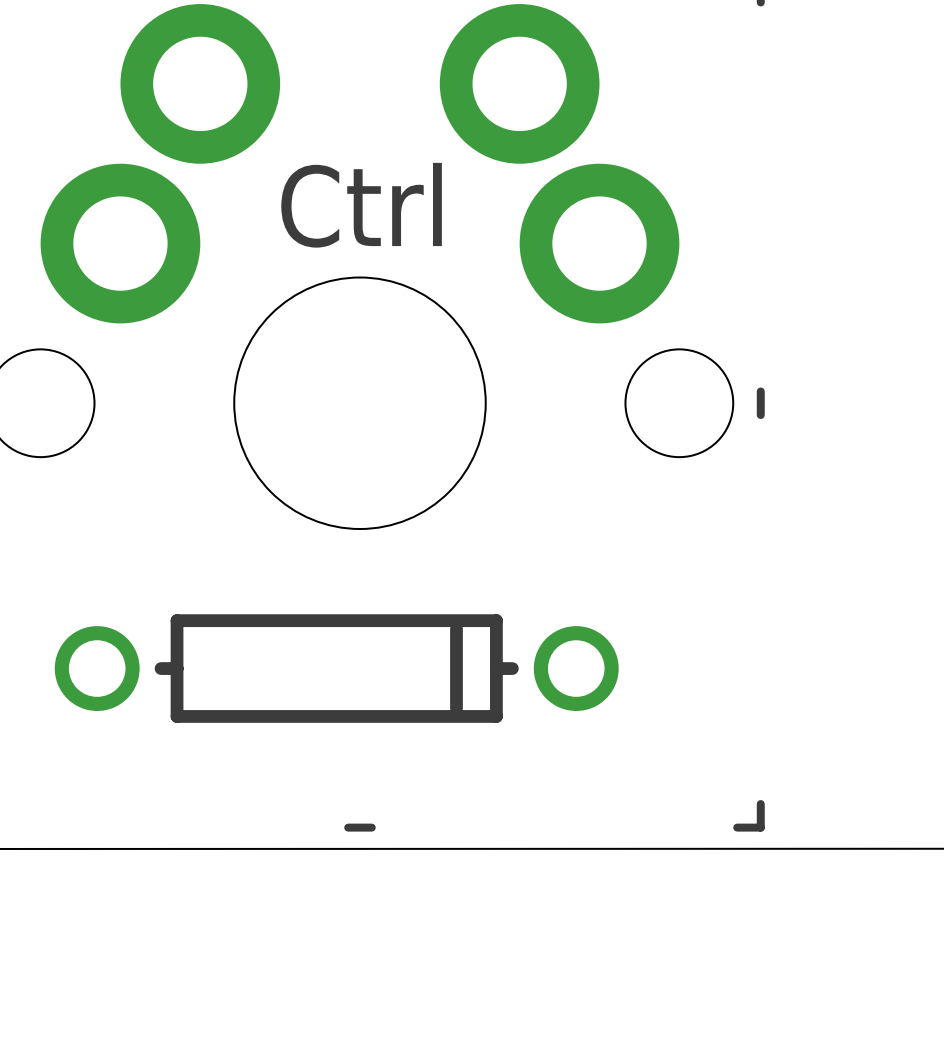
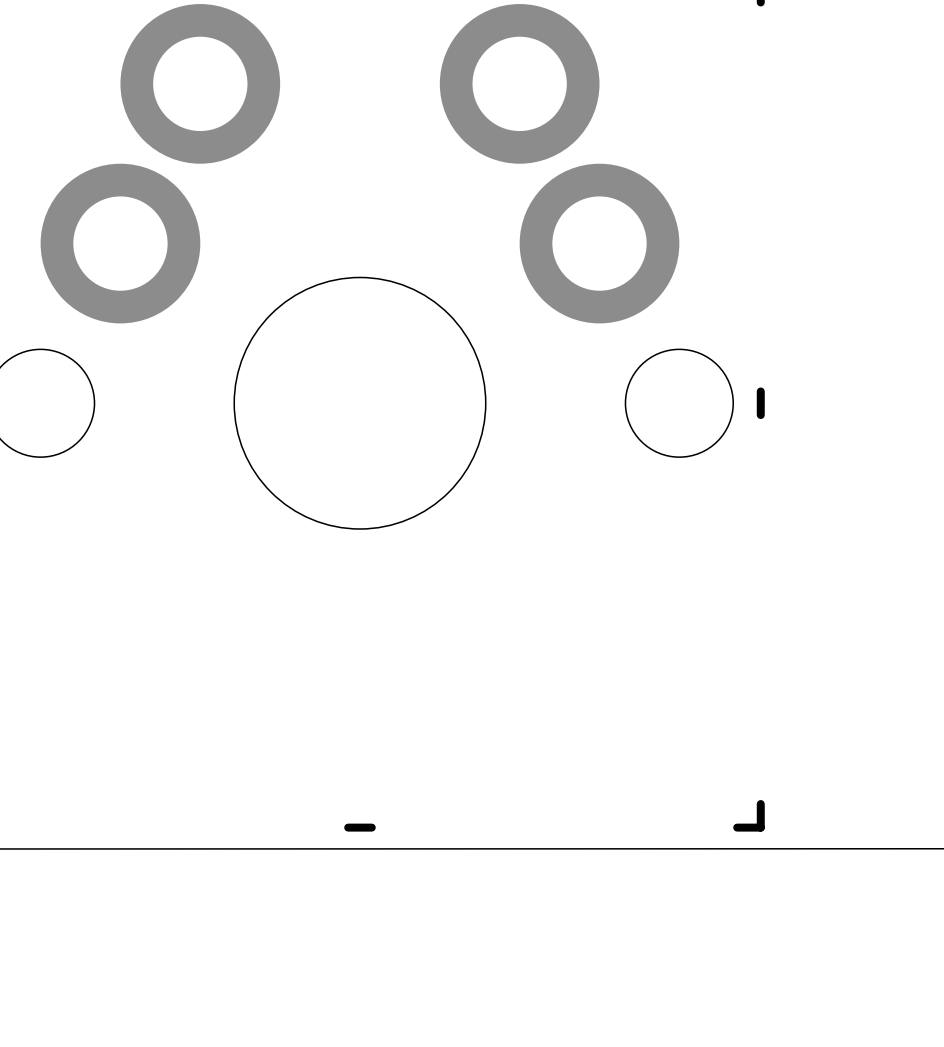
text: Ctrl (361, 205) -> none
part: (336, 668) -> none

